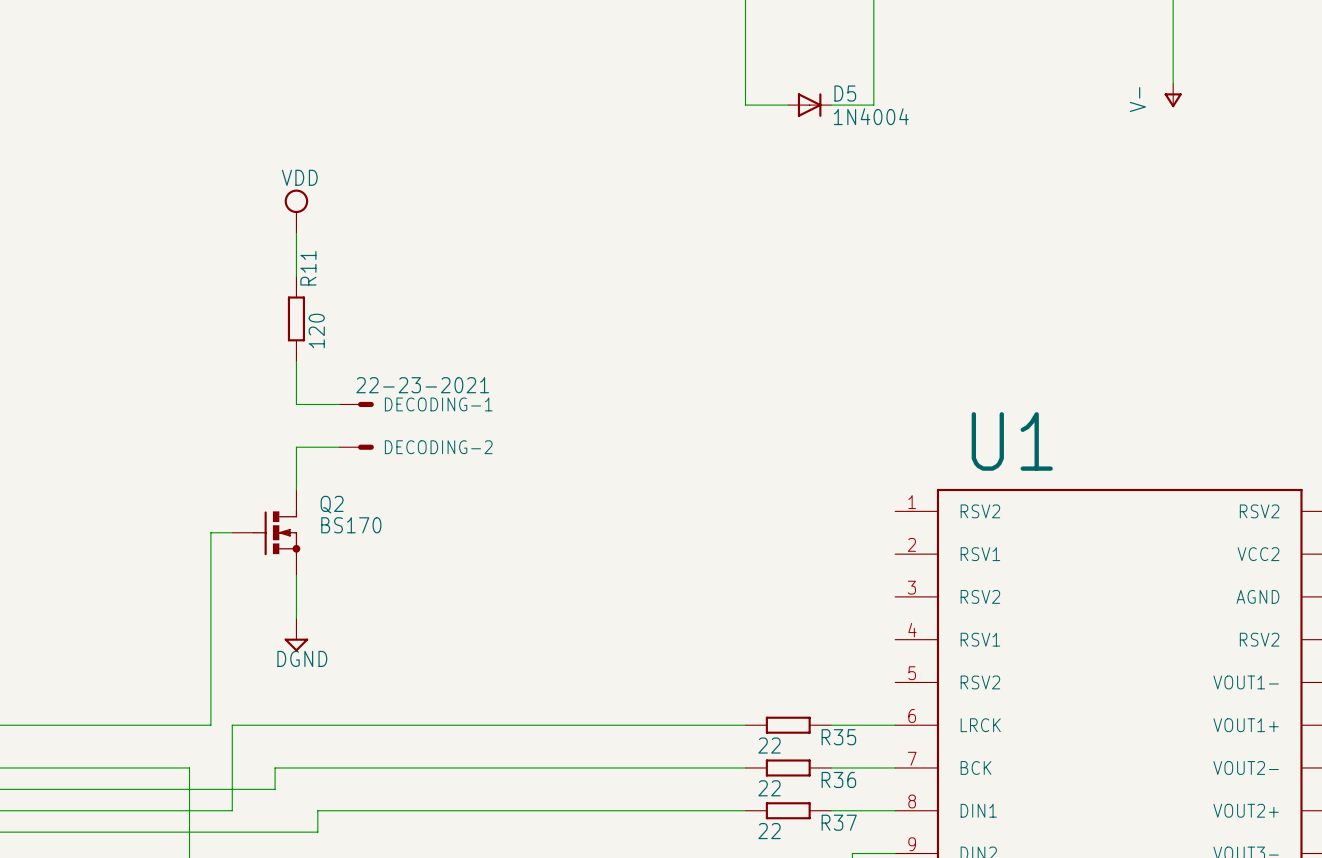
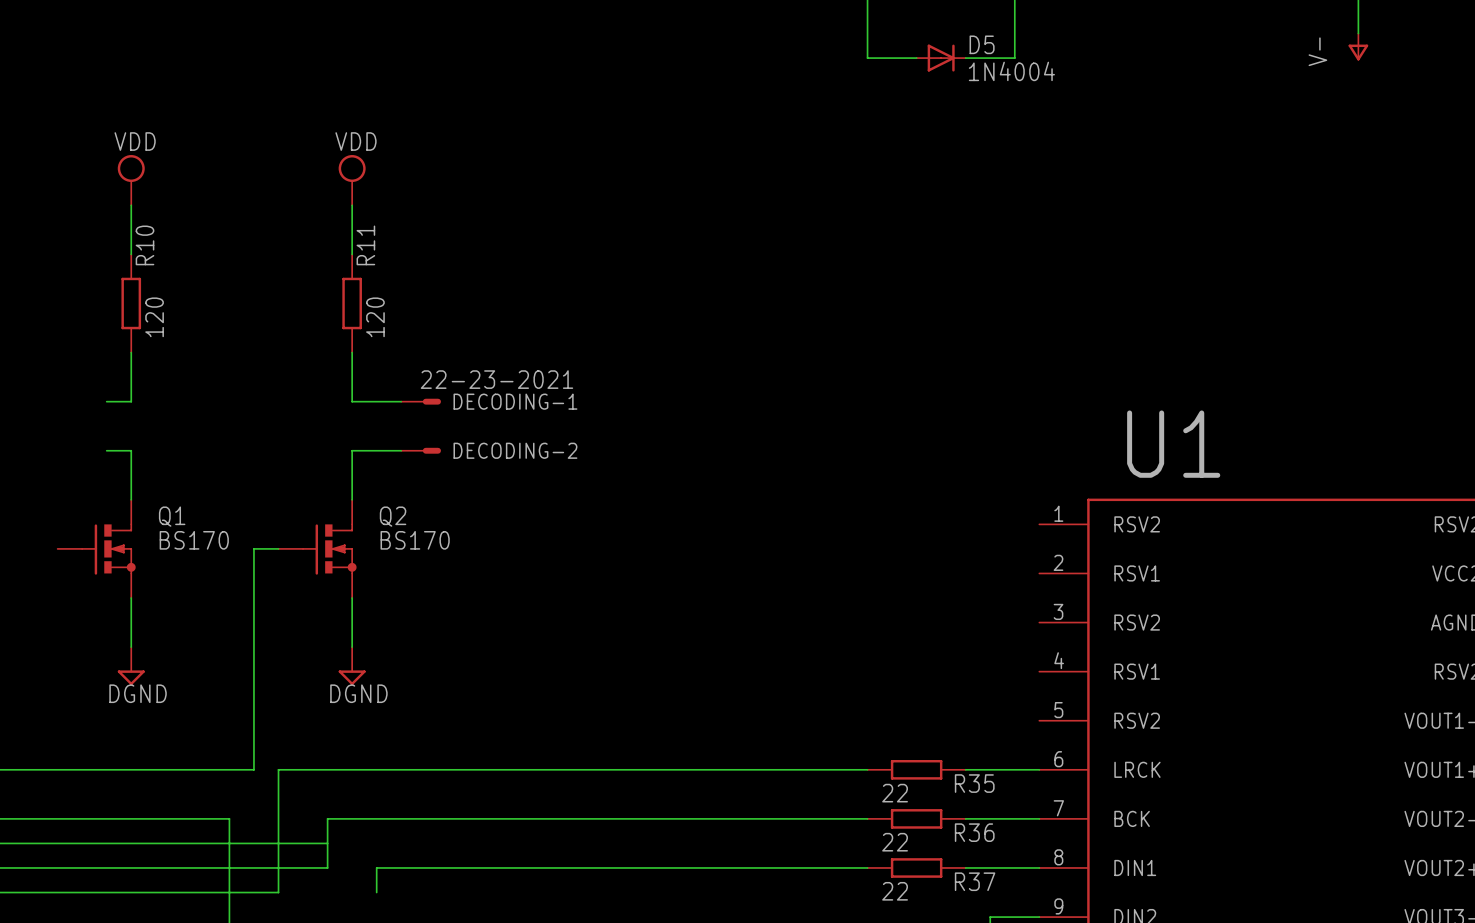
power symbol: none -> VDD (131, 180)
wire: none -> (131, 205) (131, 254)
R10: none -> 120 (131, 303)
wire: none -> (131, 352) (131, 401) (106, 401)
wire: none -> (106, 450) (131, 450) (131, 499)
Q1: none -> BS170 (96, 548)
wire: none -> (131, 598) (131, 647)
power symbol: none -> DGND (131, 666)
wire: (232, 832) (317, 832) -> (278, 892) (278, 867) (327, 867) (327, 843)

